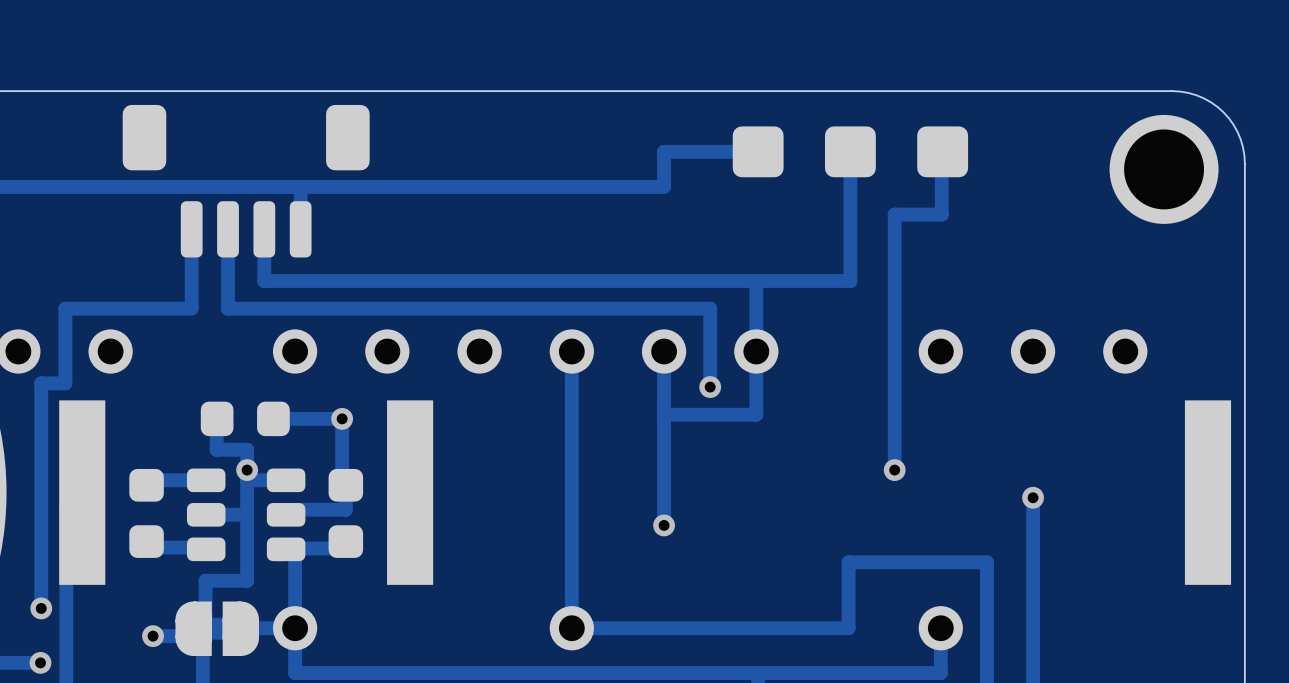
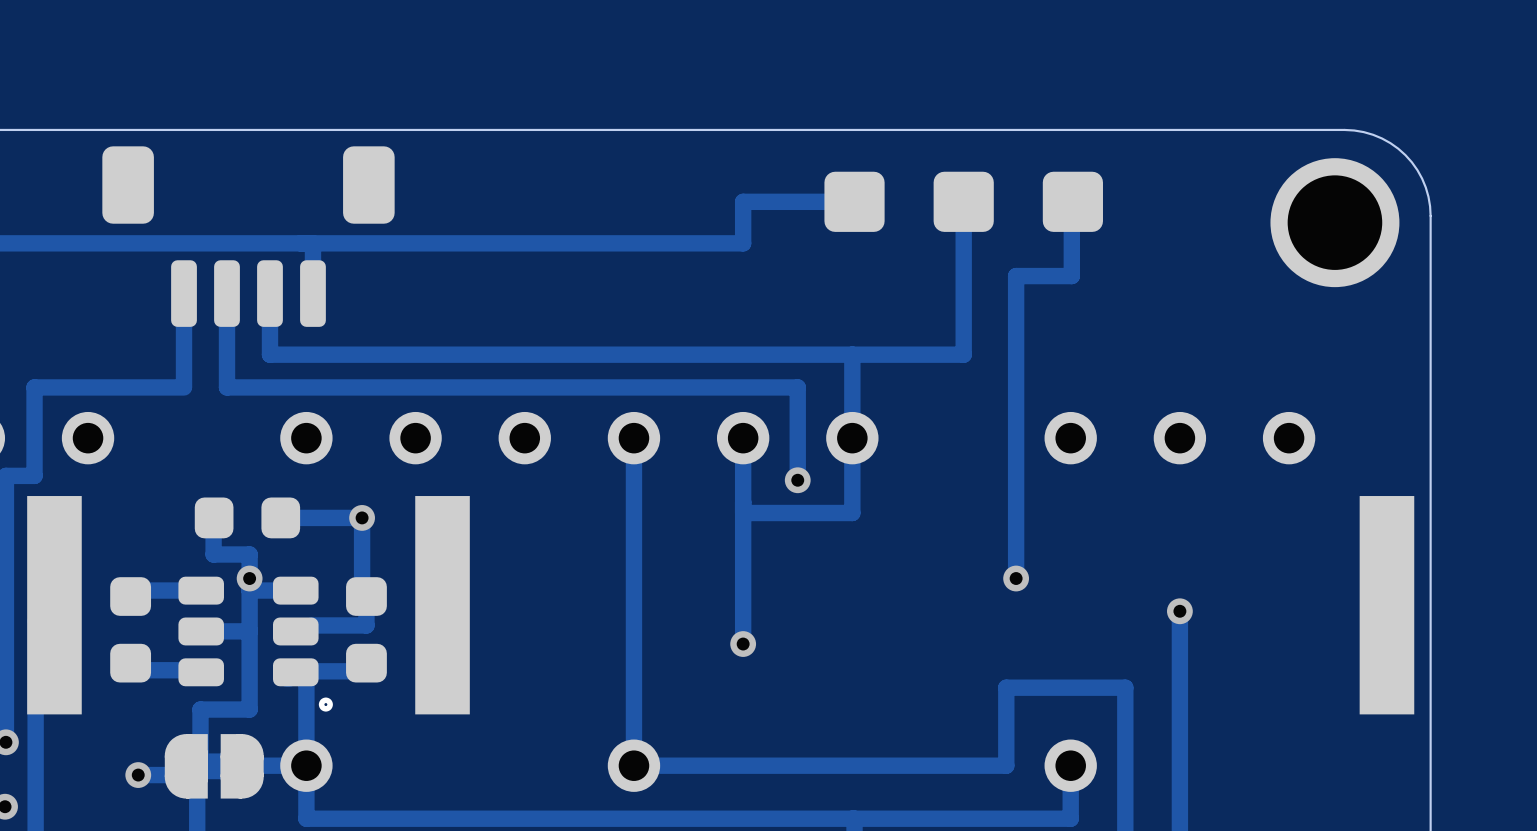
part footprint: [186, 468, 306, 562] -> [178, 576, 333, 712]
track: (886, 562) (848, 562) (848, 628) -> (1006, 687) (1006, 765) (961, 765)

